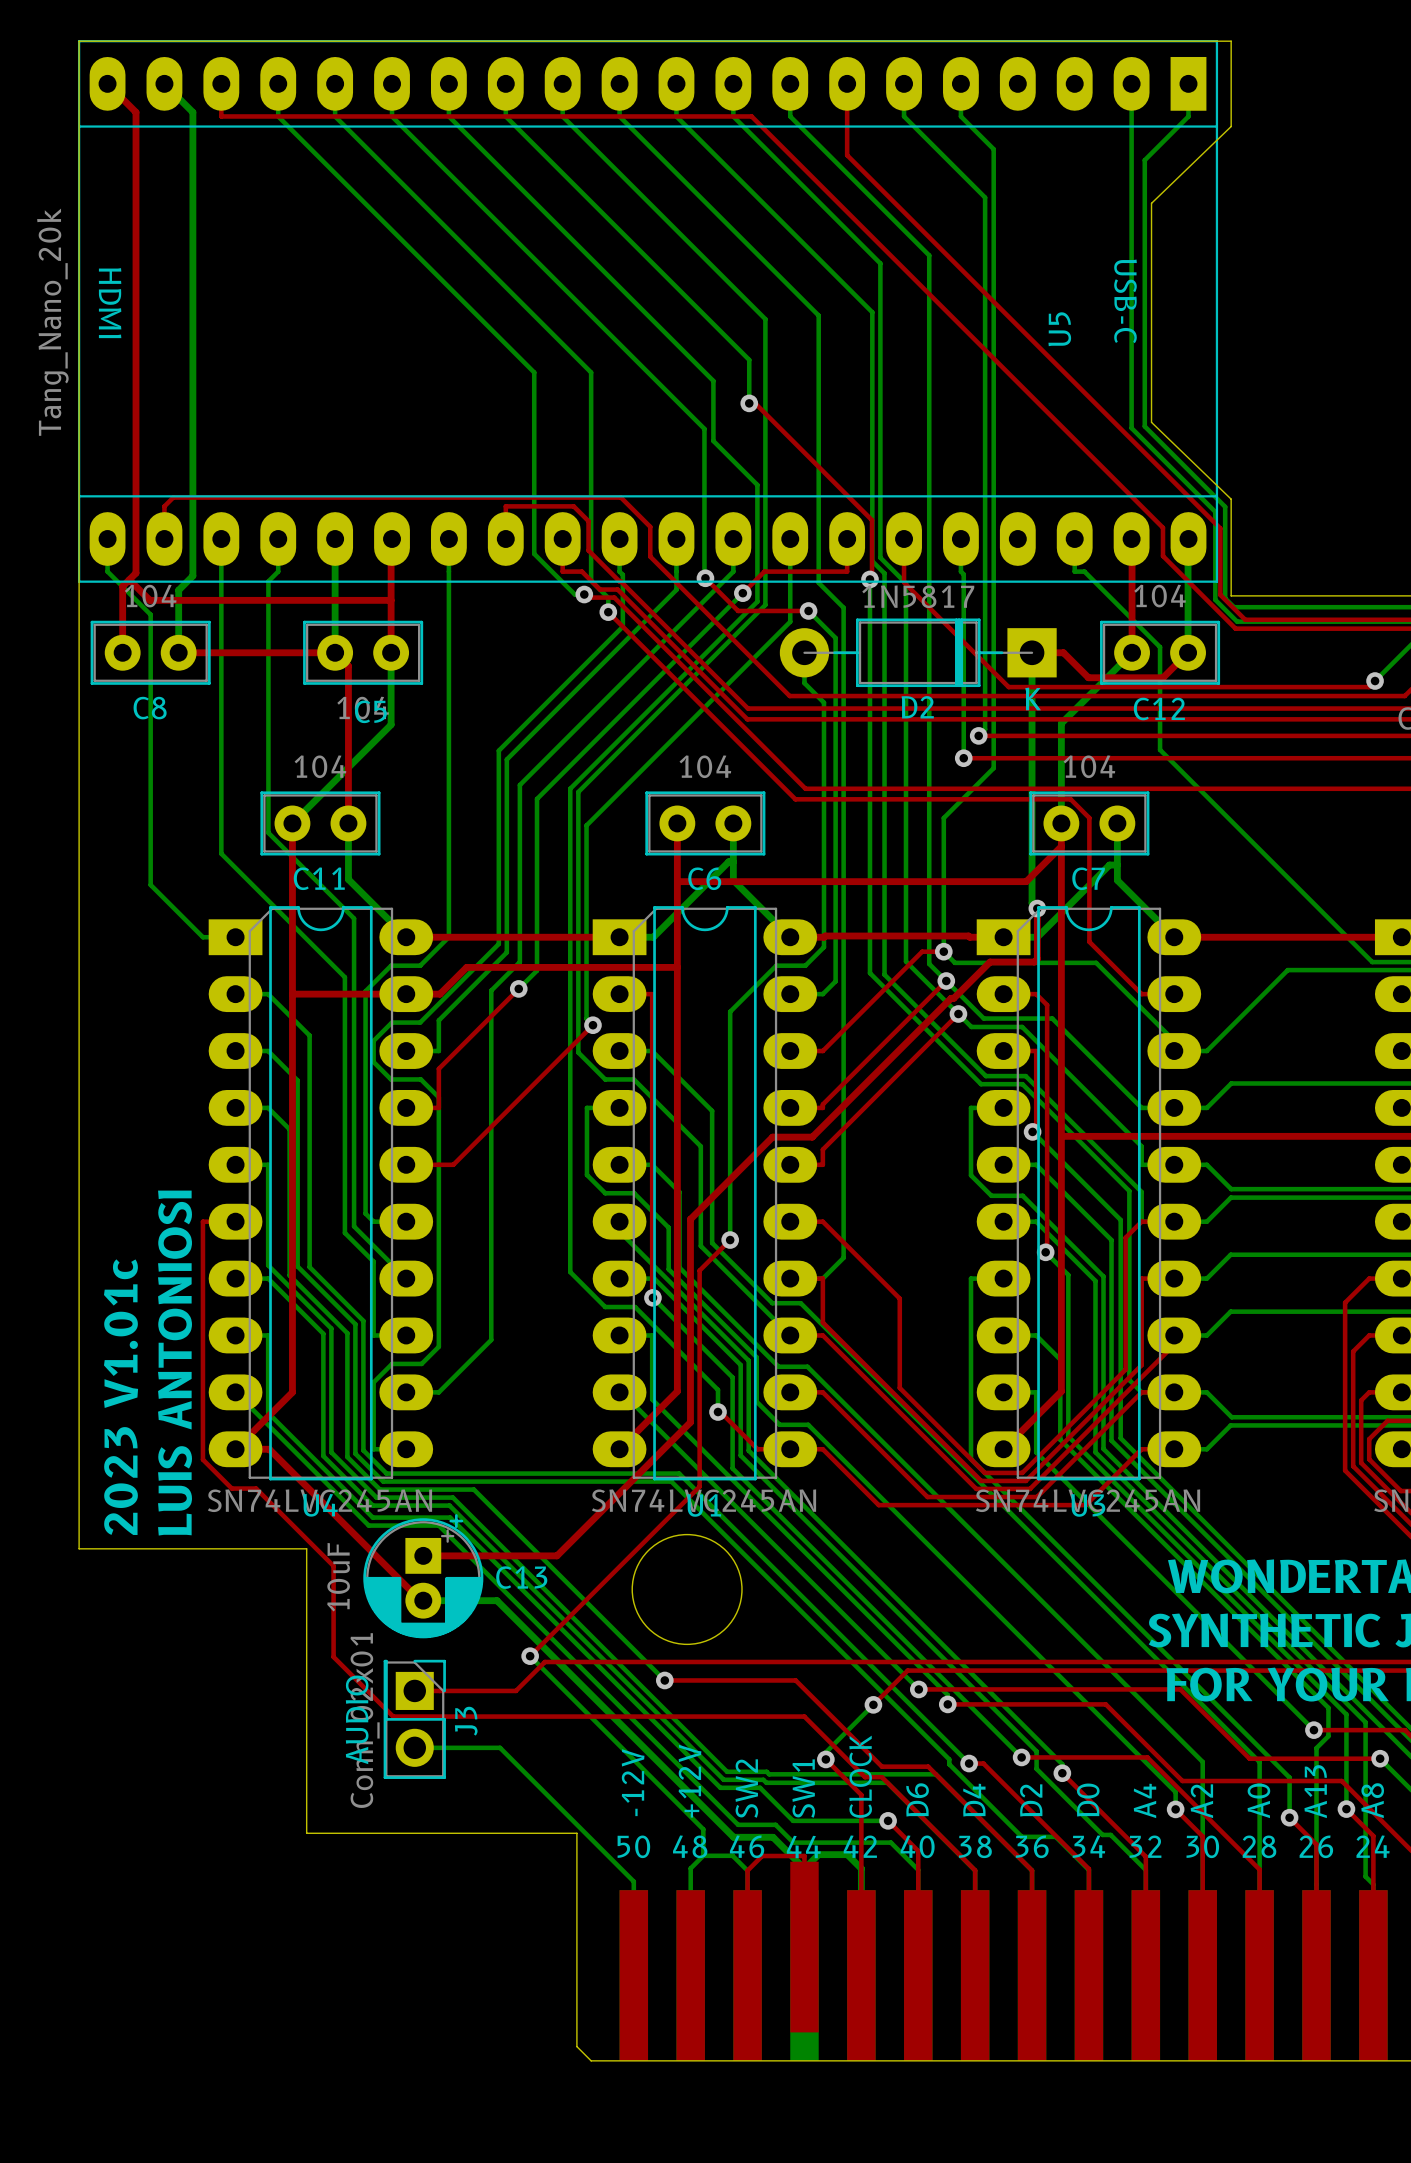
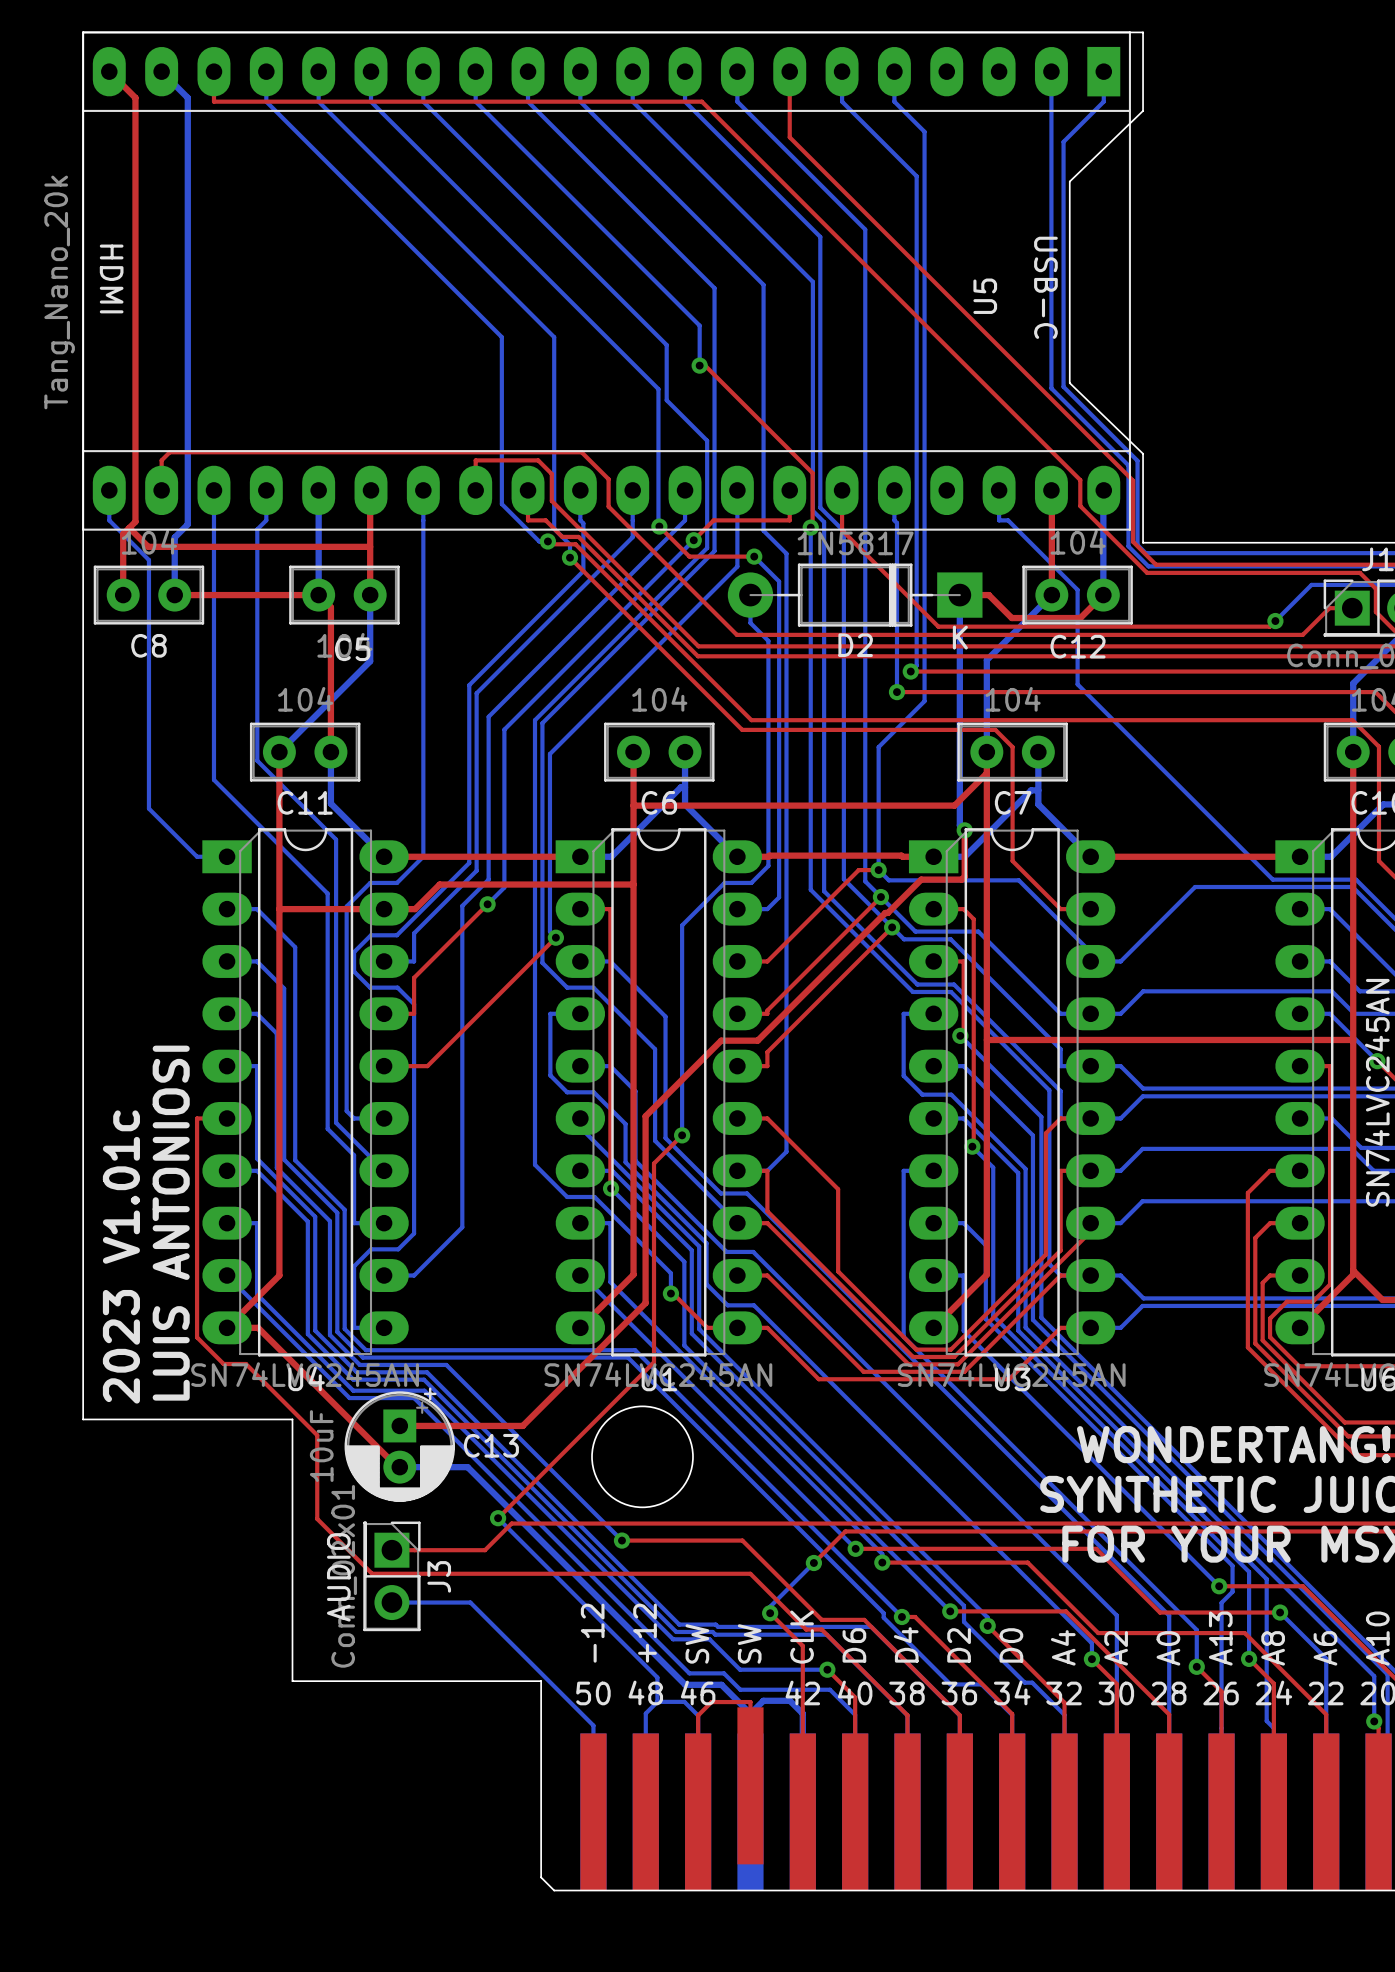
text: CLOCK (860, 1776) -> CLK (802, 1637)
text: +12V (690, 1781) -> +12 (645, 1633)
text: -12V (633, 1782) -> -12 (592, 1633)
text: SW2 (746, 1788) -> SW (697, 1643)
text: SW1 (803, 1788) -> SW (749, 1643)
text: 44 (803, 1847) -> none

